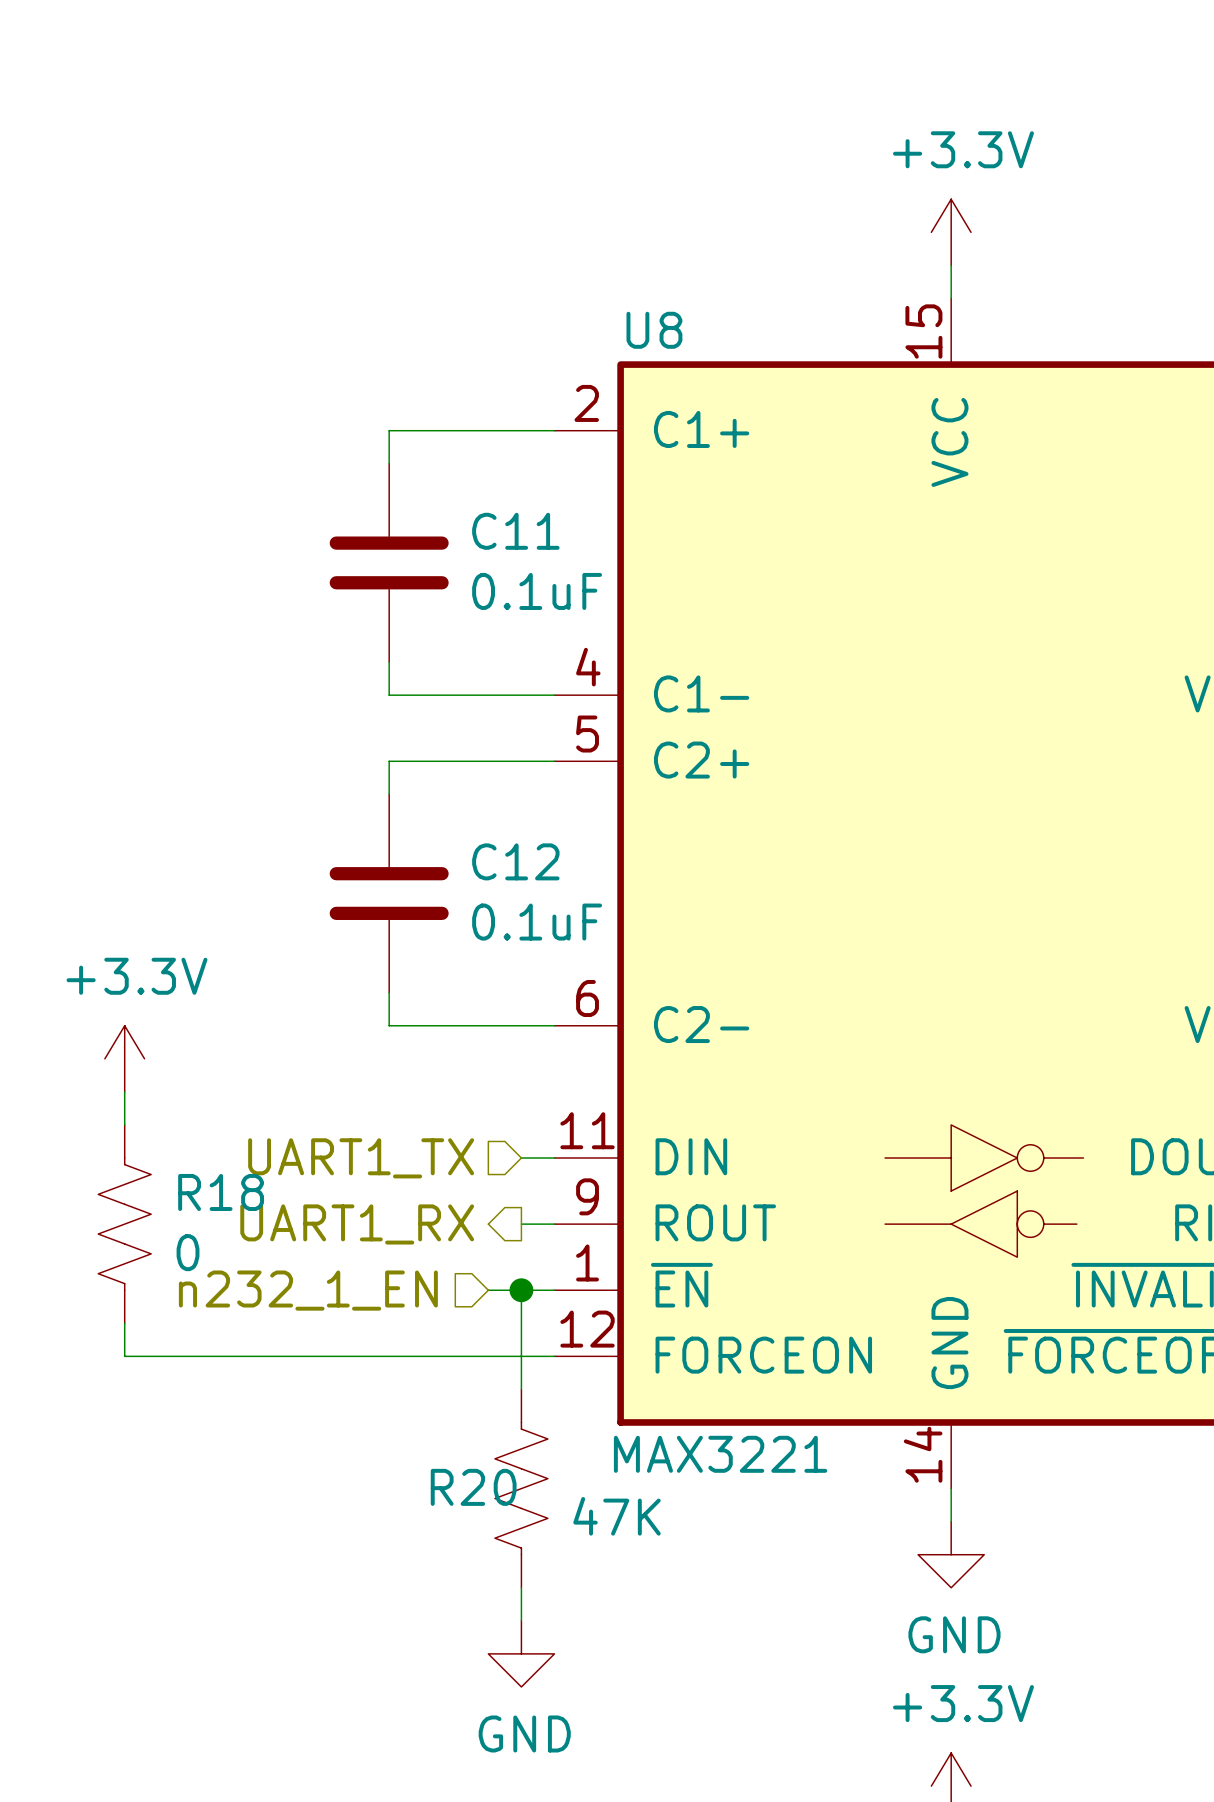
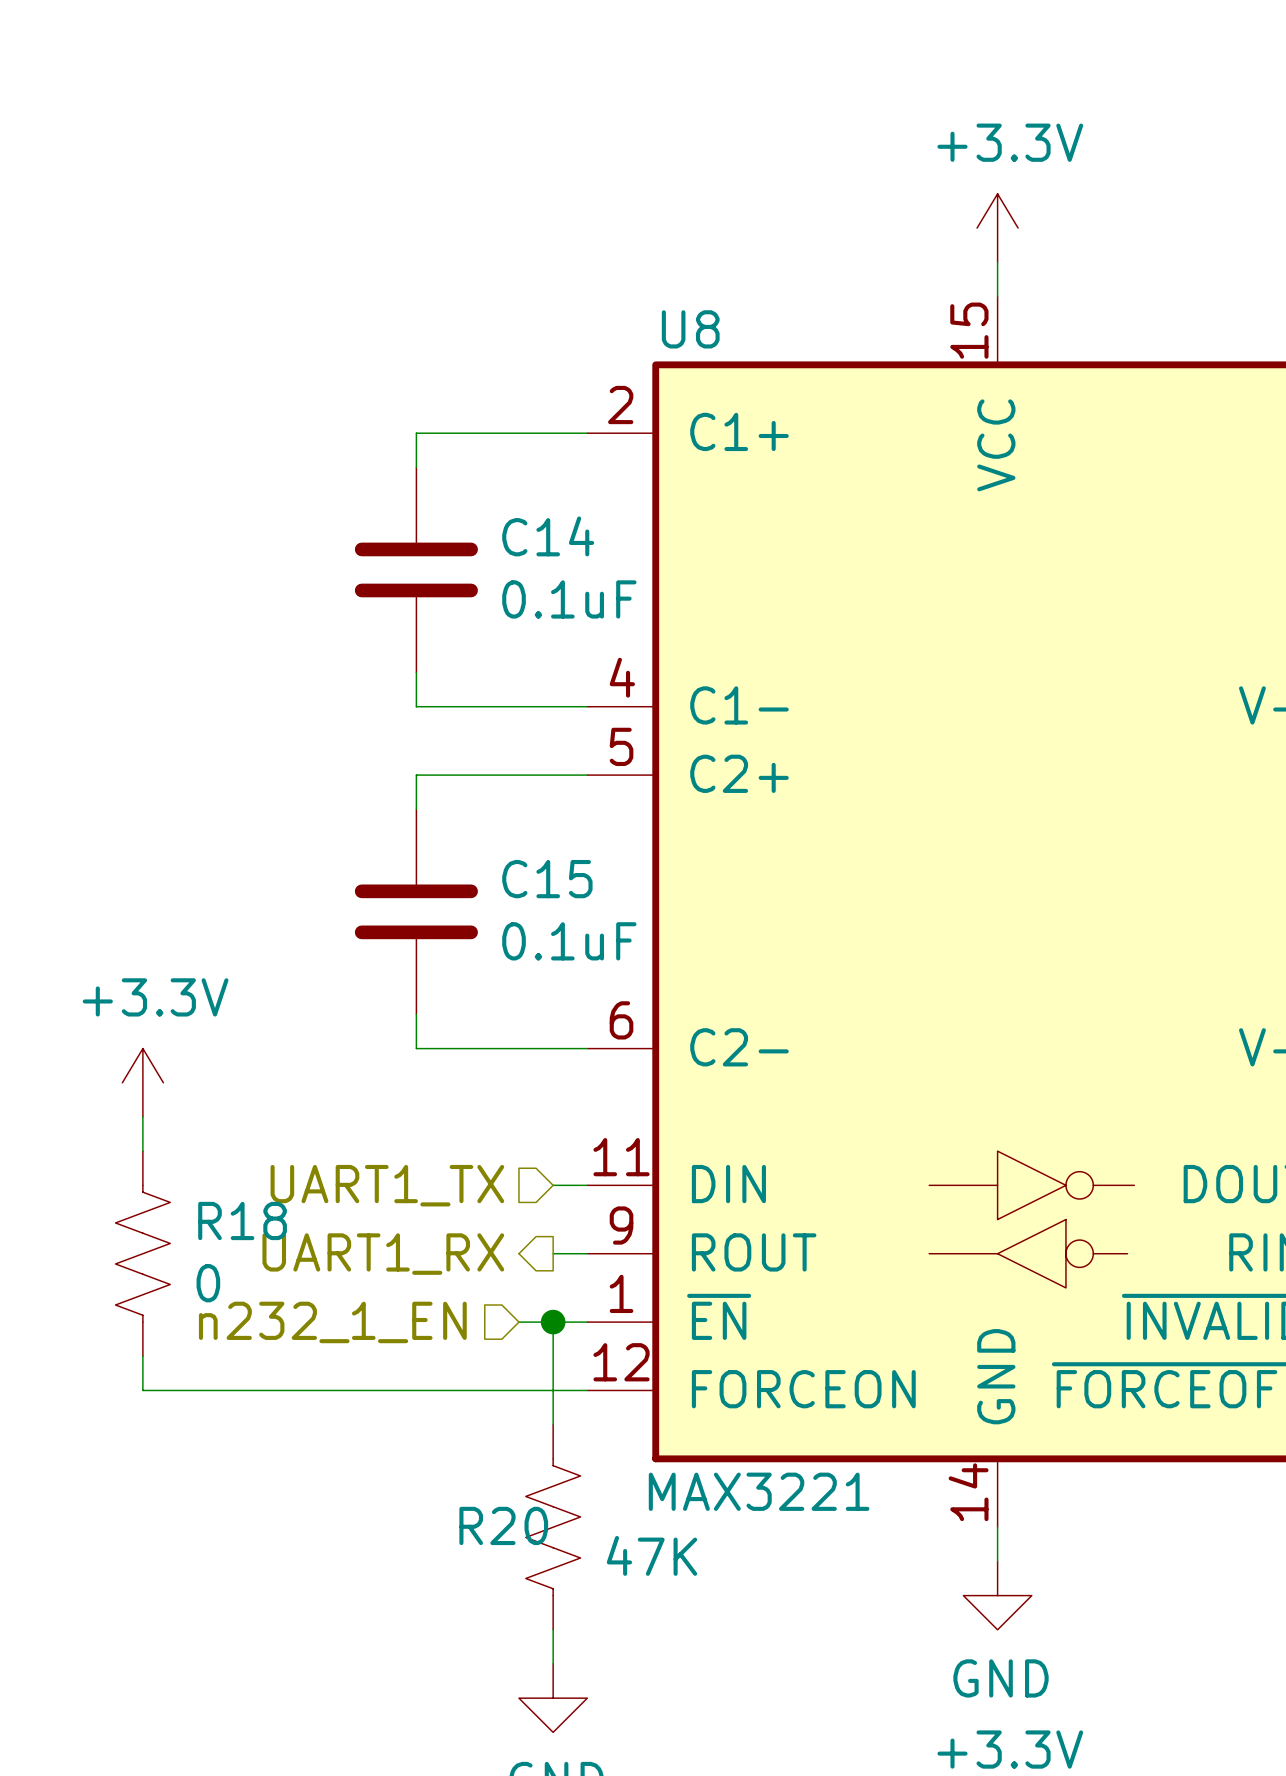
C11 name: C11 (515, 531) -> C14 (548, 536)
C12 name: C12 (515, 861) -> C15 (547, 879)

